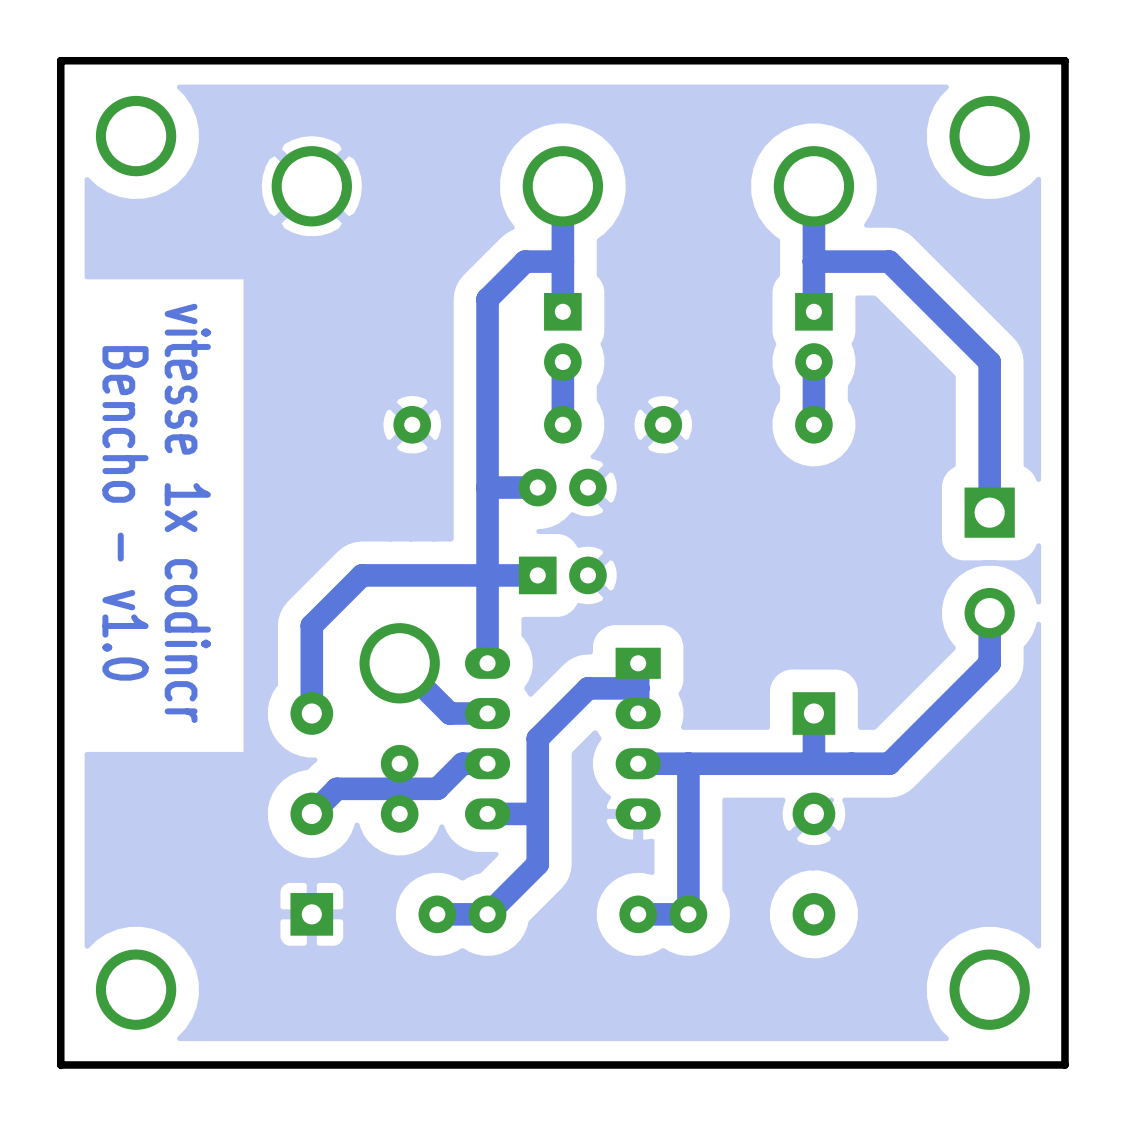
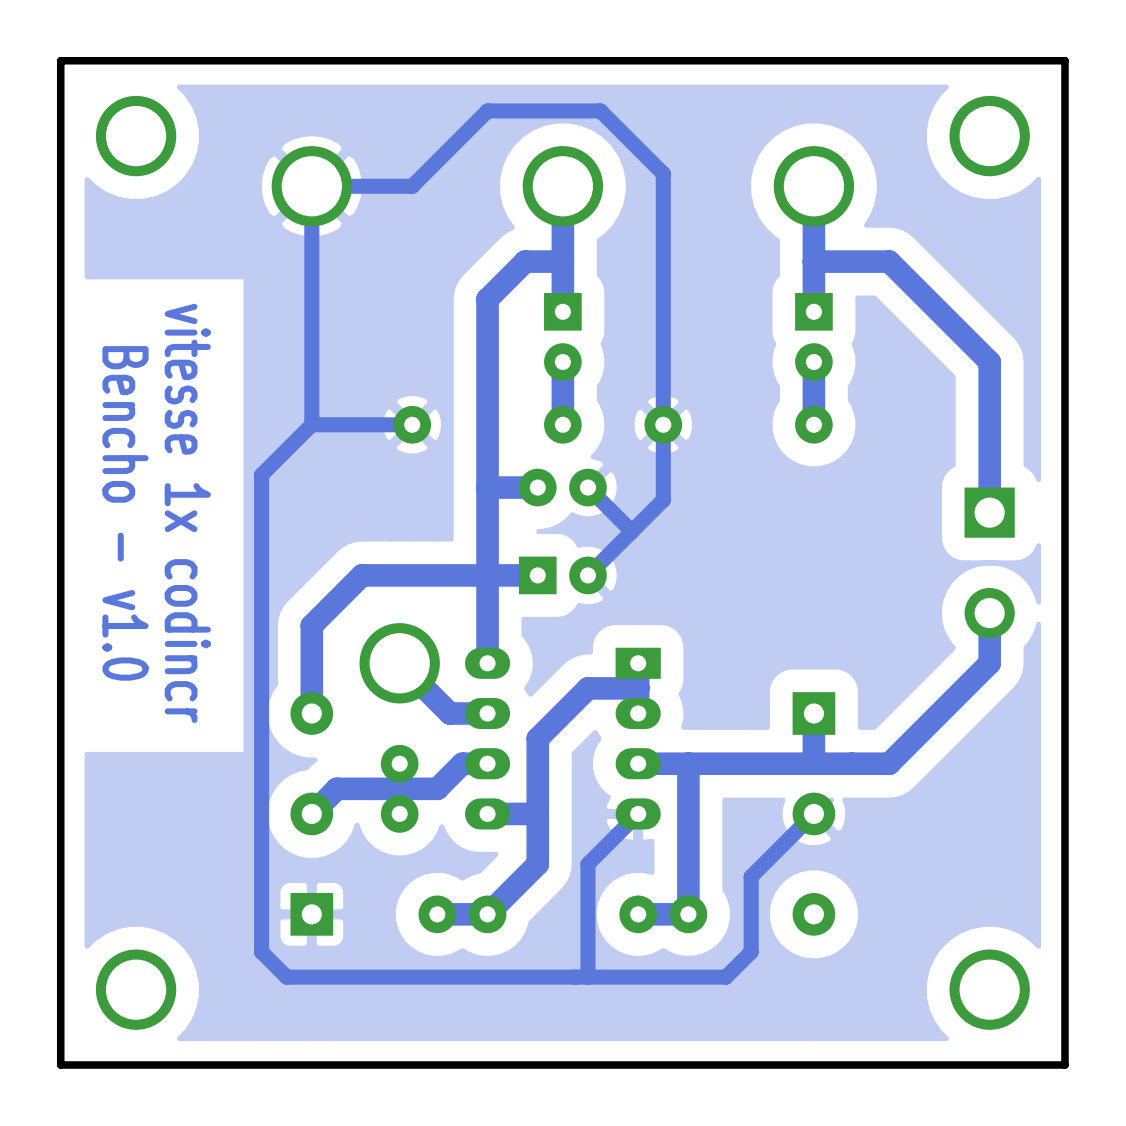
bottom track: none -> (311, 424) (261, 475) (261, 952) (286, 977) (726, 977) (751, 952) (751, 876) (813, 813)
bottom track: none -> (311, 424) (311, 186) (412, 186) (487, 110) (600, 110) (663, 173) (663, 500) (587, 575)
bottom track: none -> (412, 424) (311, 424)
bottom track: none -> (587, 487) (631, 531)
bottom track: none -> (638, 813) (587, 864) (587, 977)

